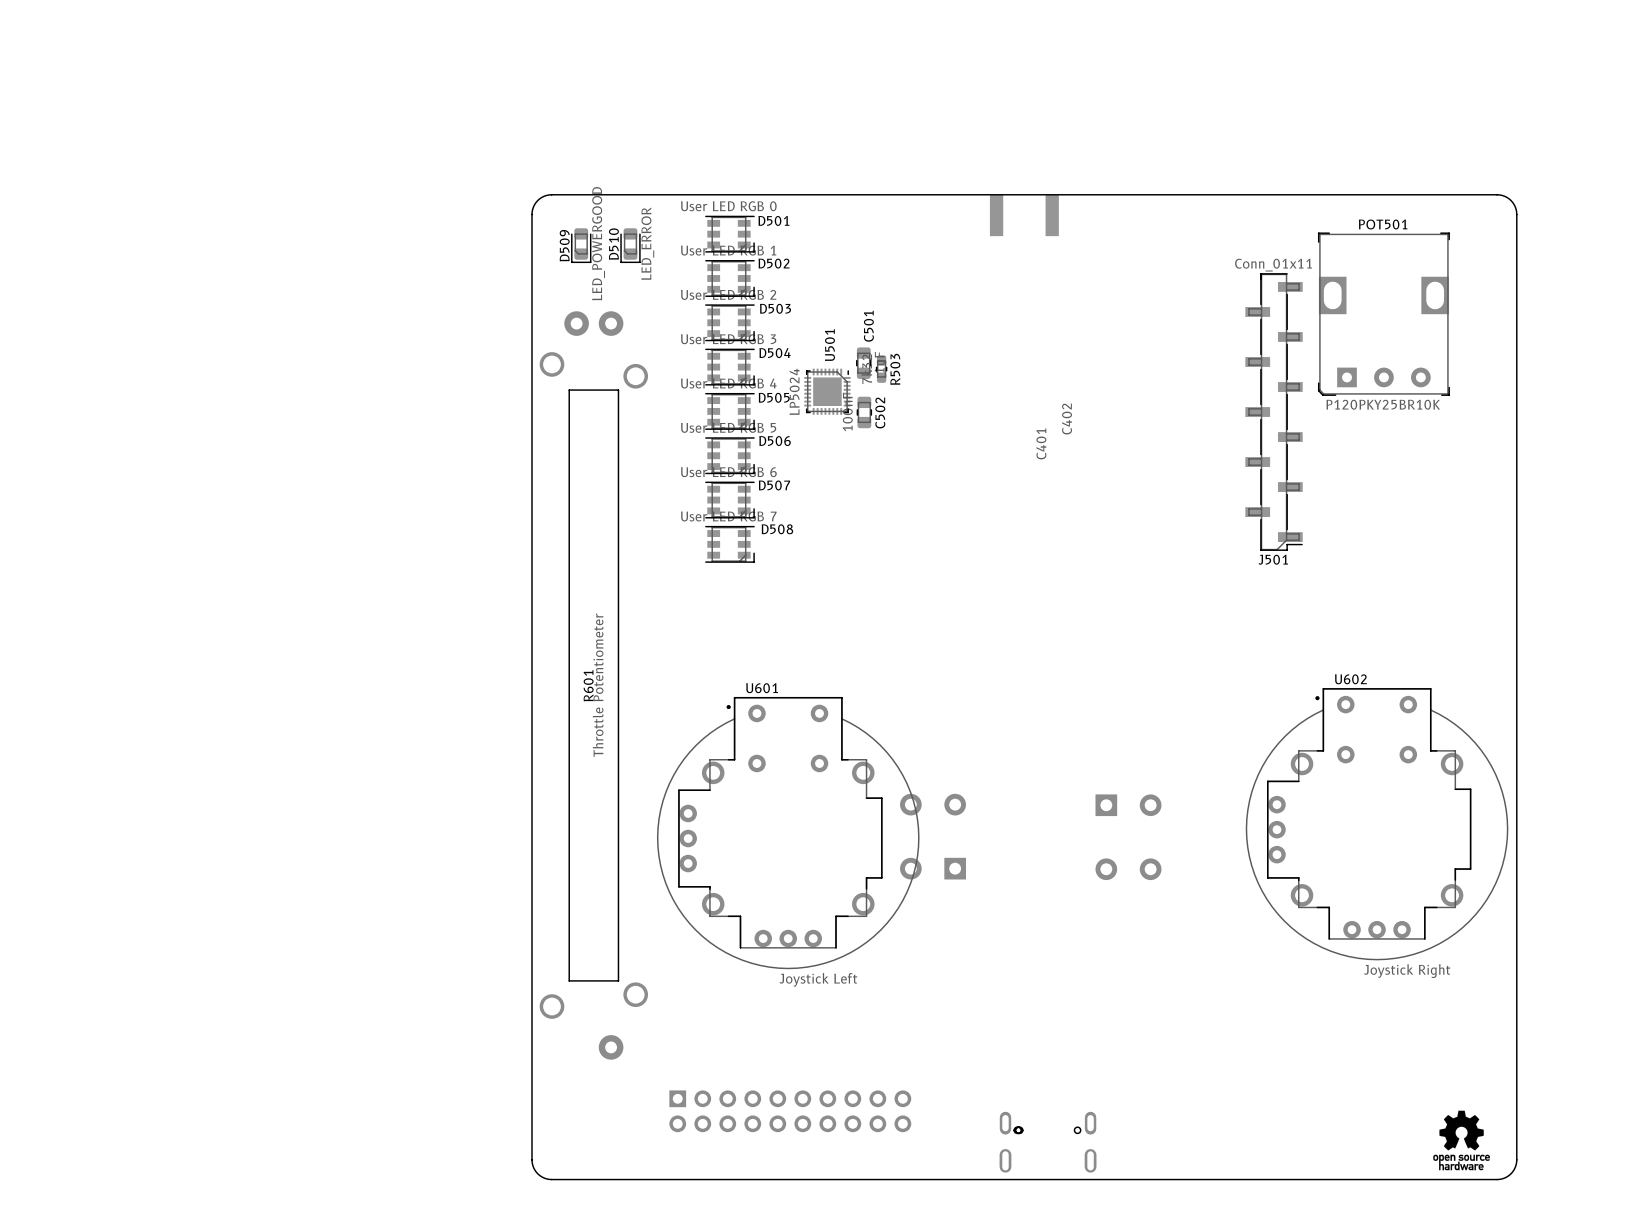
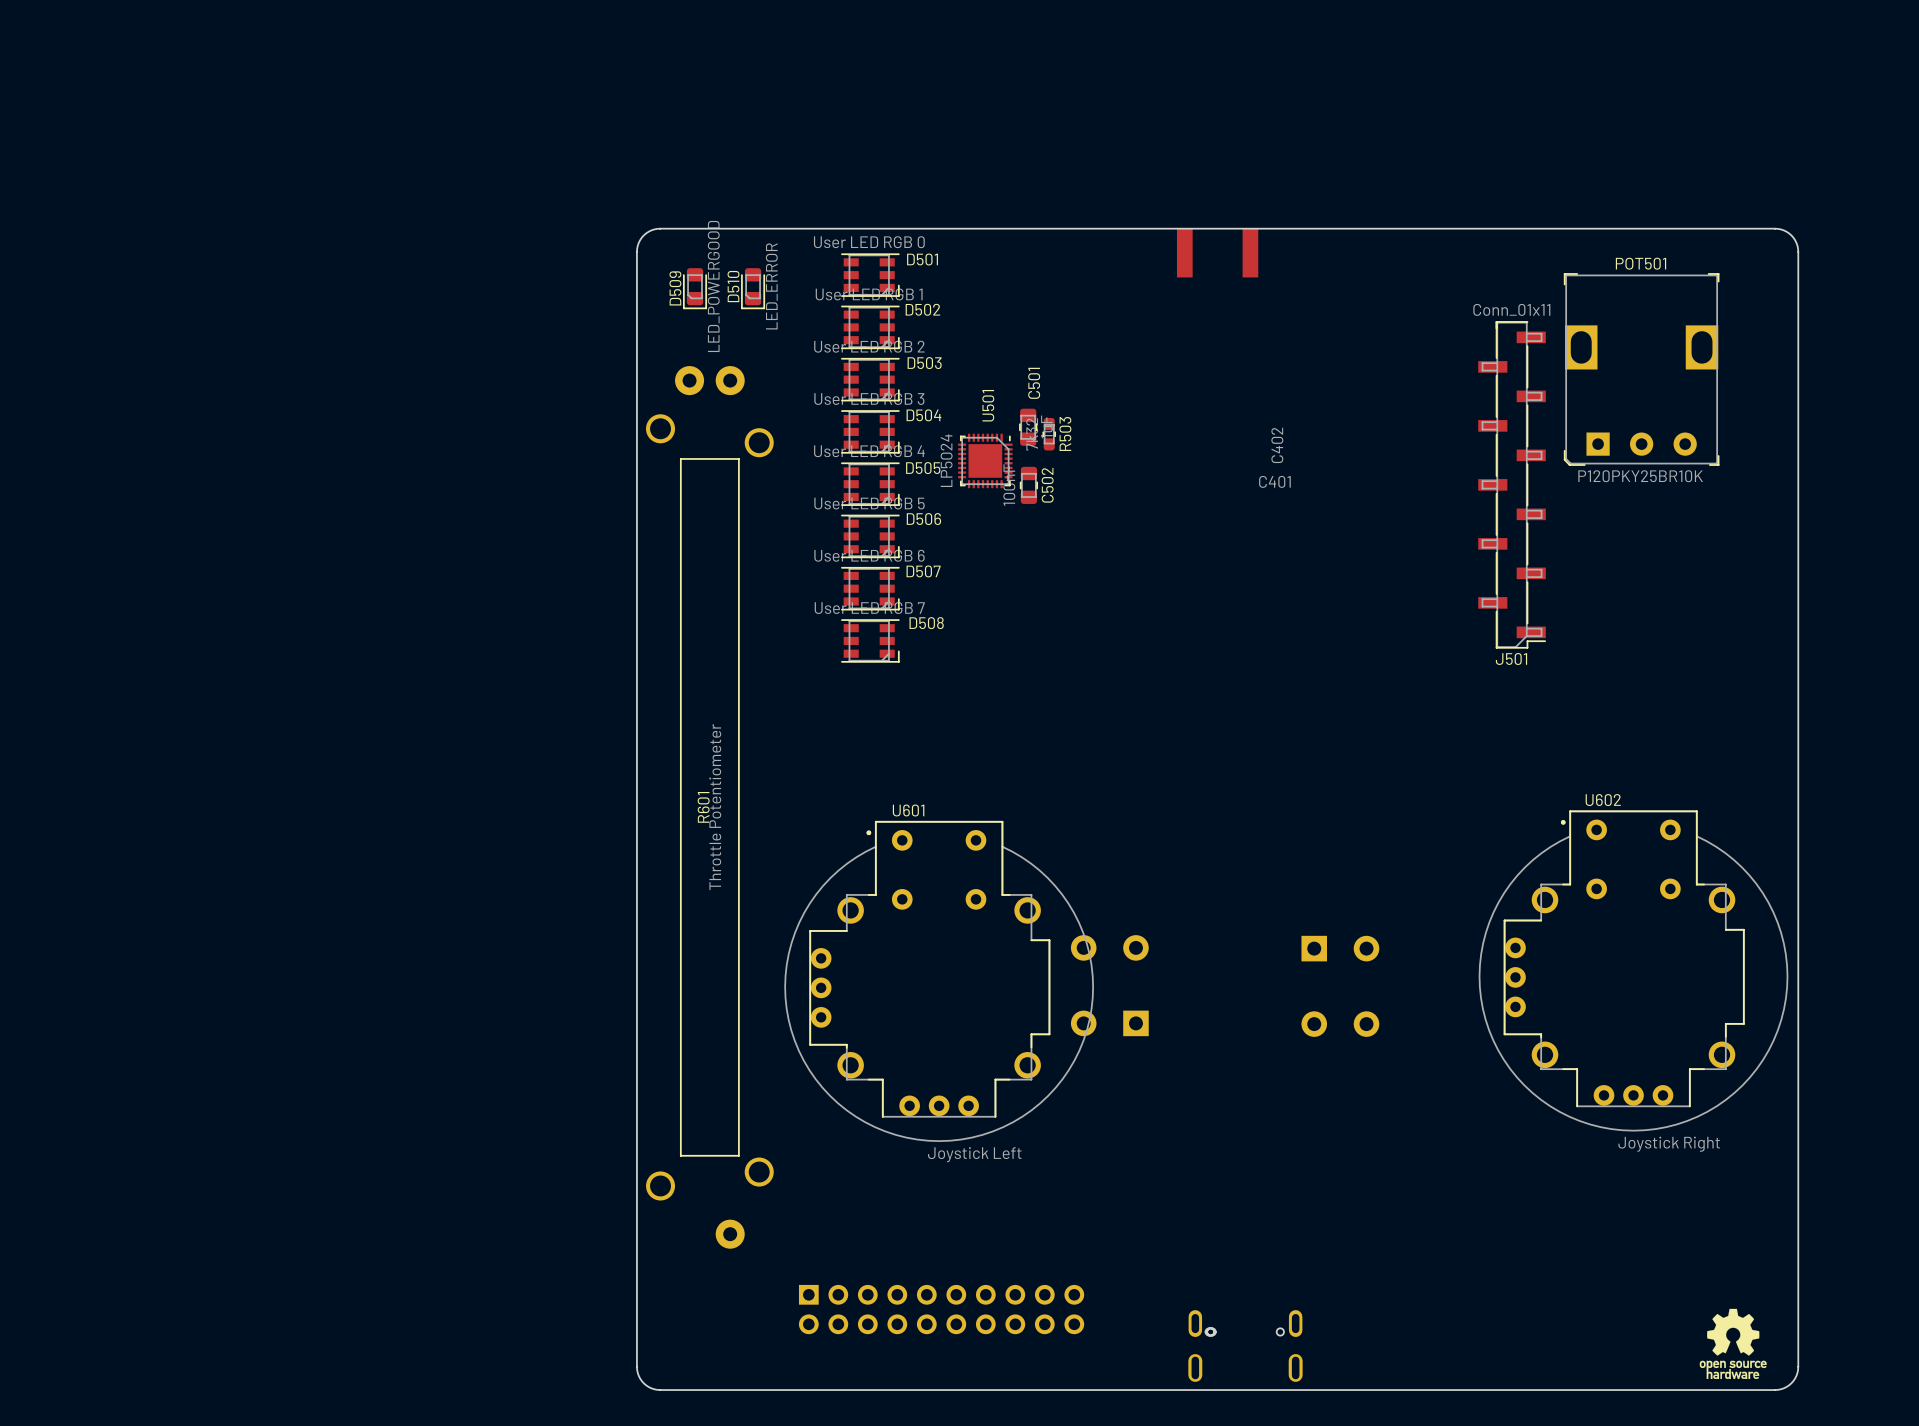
C402 position: (1067, 419) -> (1277, 445)
C401 position: (1041, 443) -> (1274, 481)
C401 name rotation: 0° (1041, 443) -> 90° clockwise (1274, 481)

